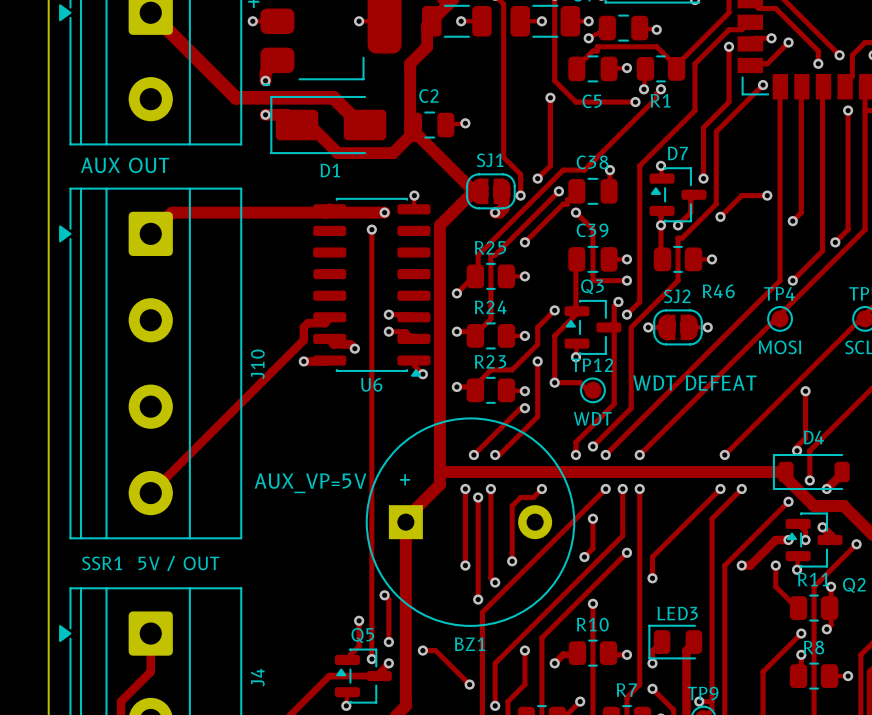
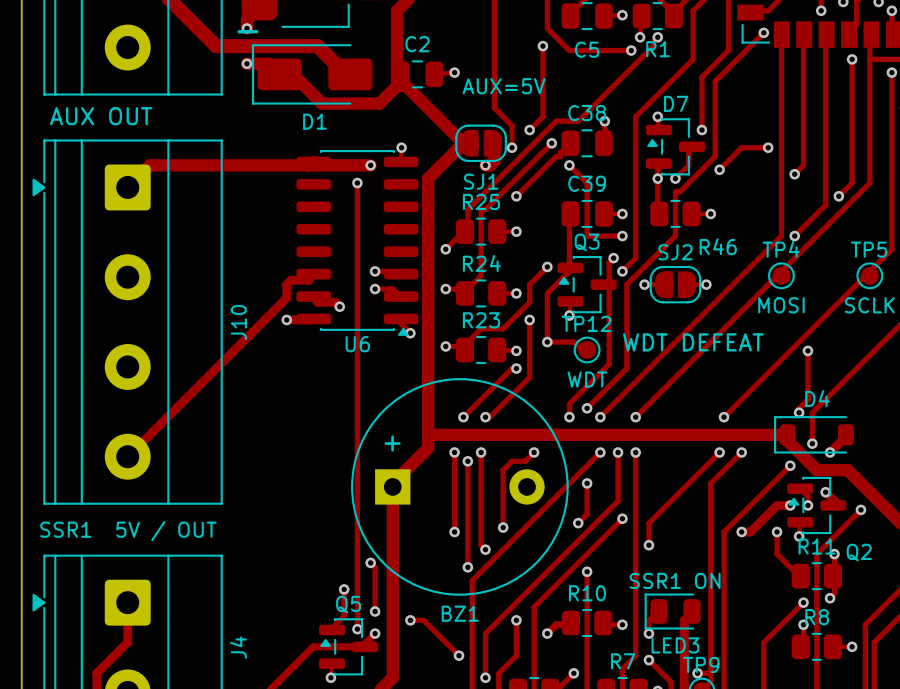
text: none -> AUX=5V (504, 86)
SJ1 name position: SJ1 (490, 160) -> SJ1 (481, 181)
text: AUX_VP=5V (310, 483) -> none
text: none -> SSR1 ON (675, 580)
LED3 name position: LED3 (677, 613) -> LED3 (675, 645)

